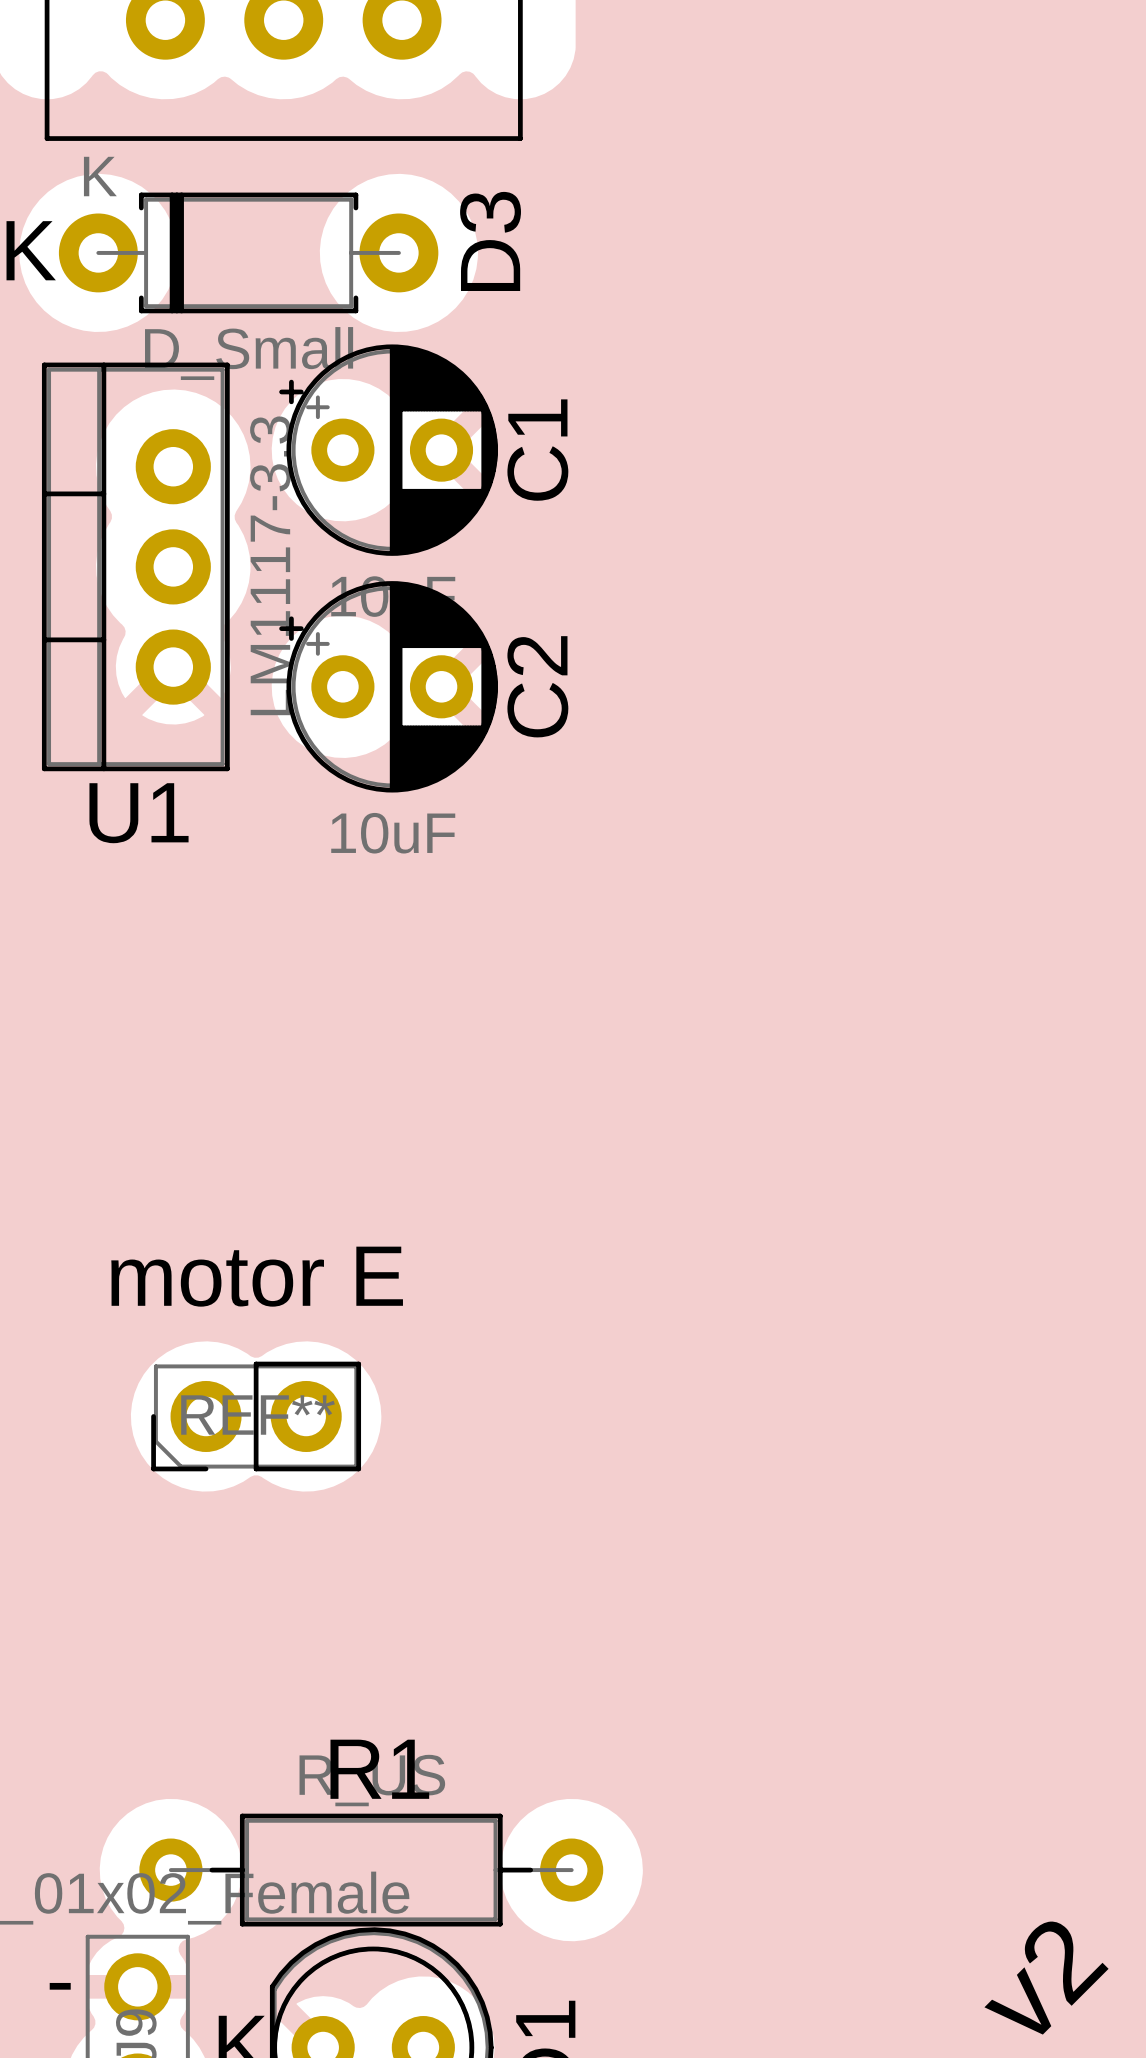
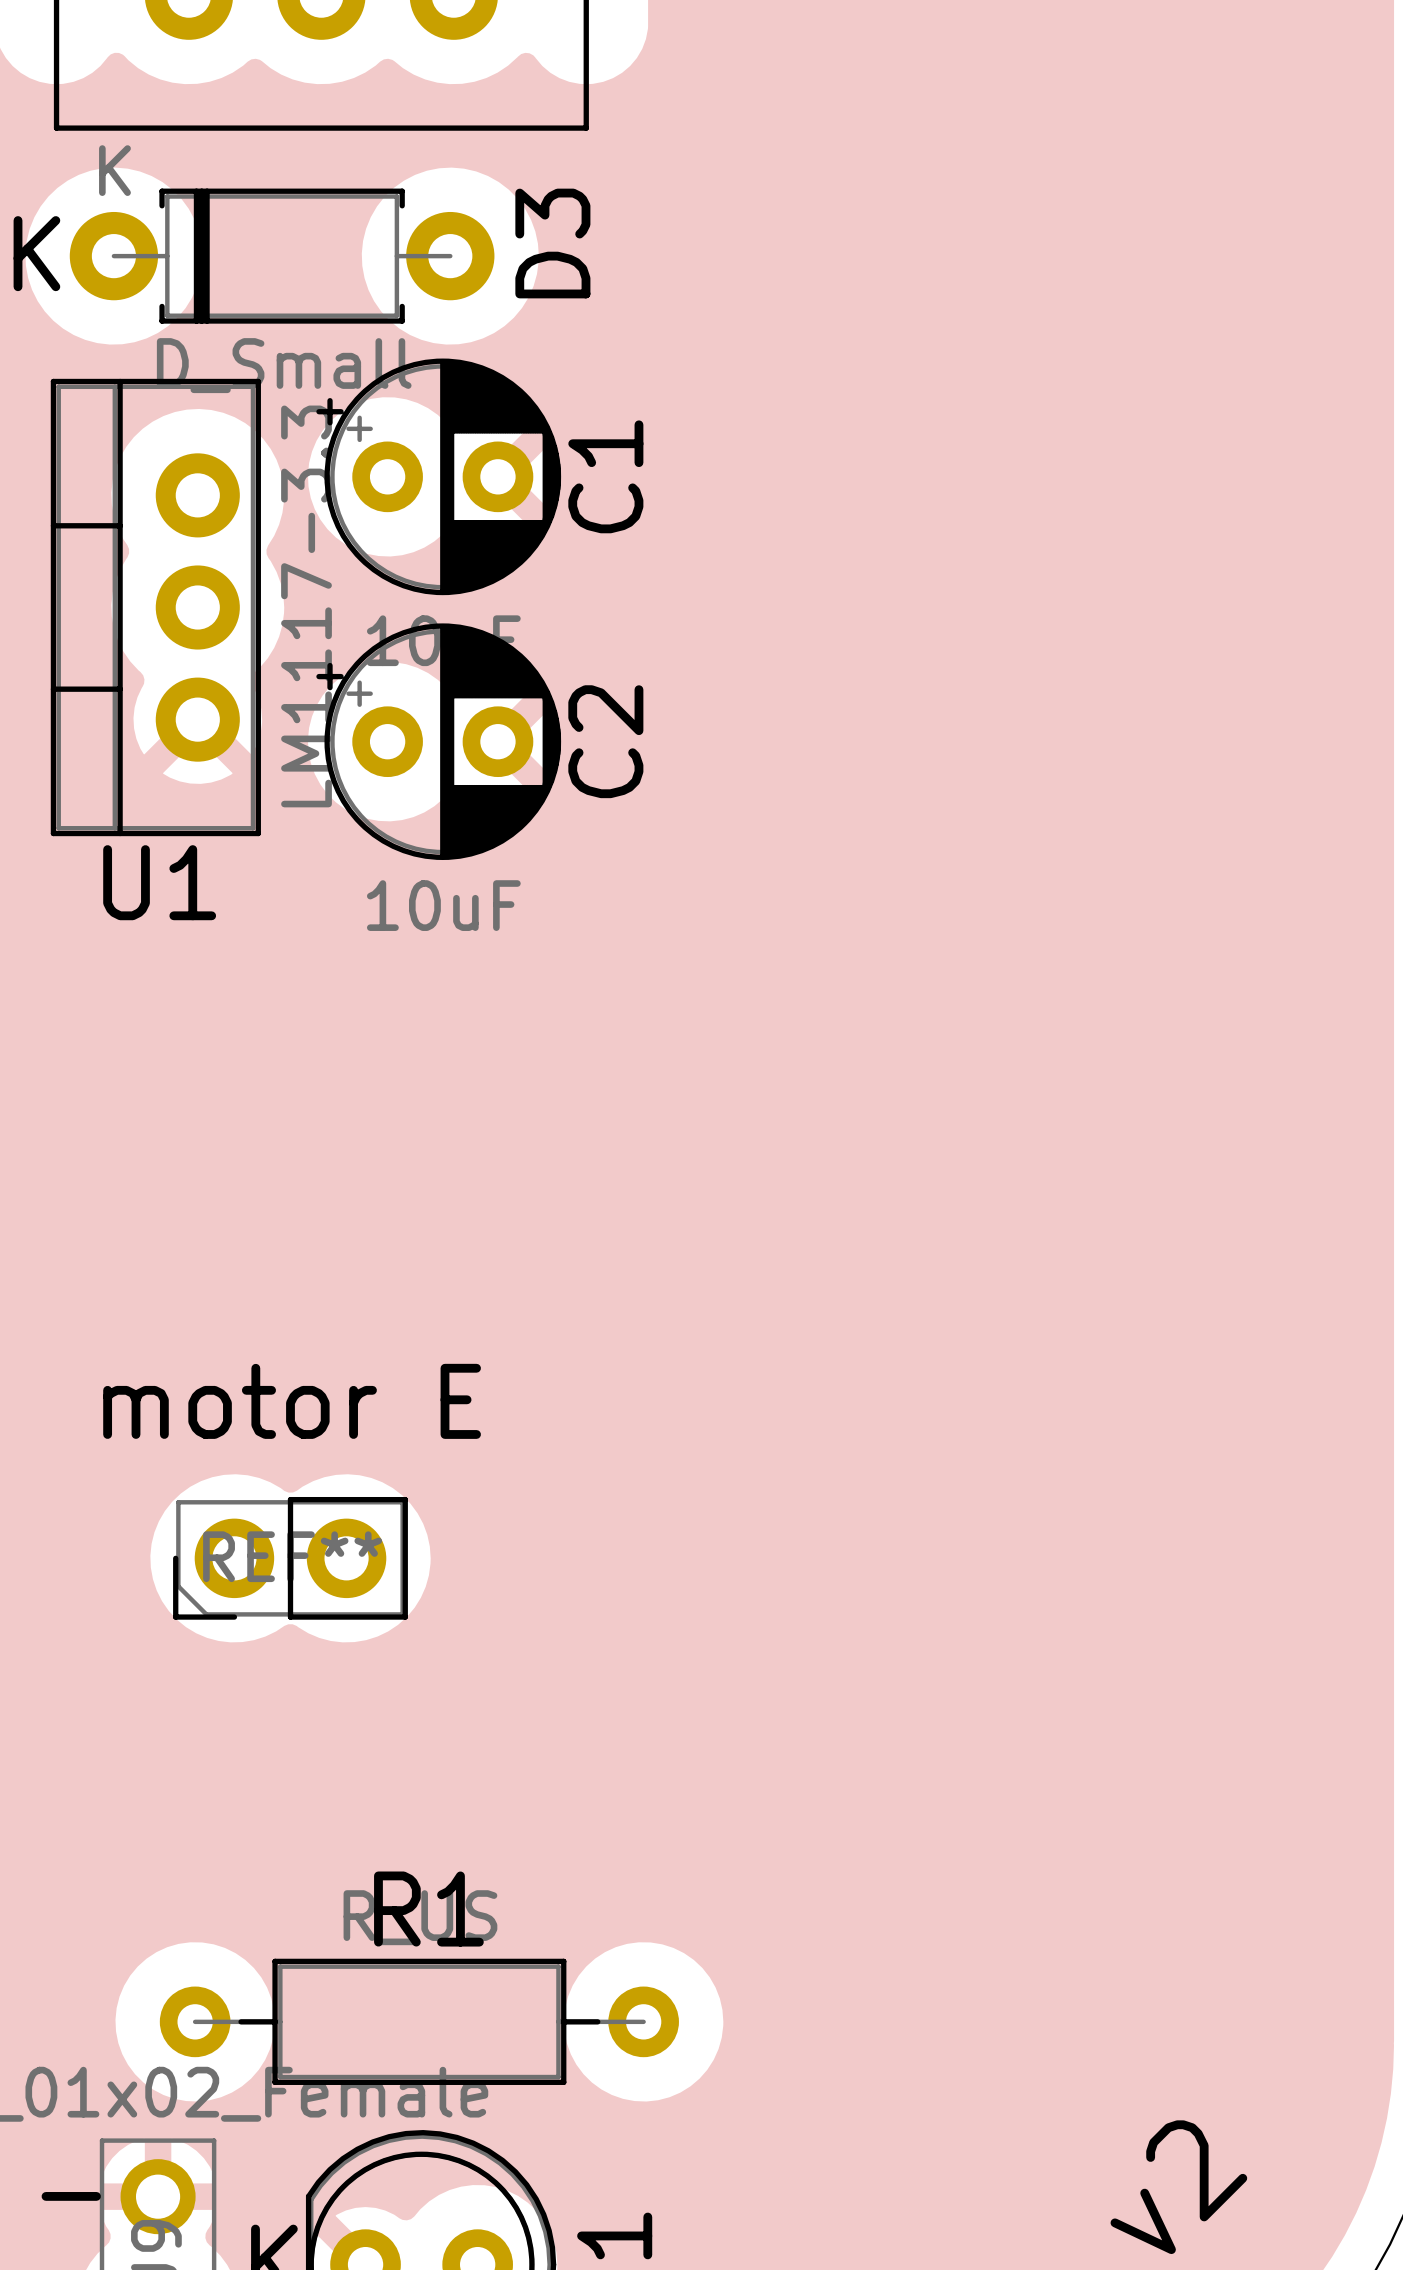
R1 position: (371, 1870) -> (419, 2021)

